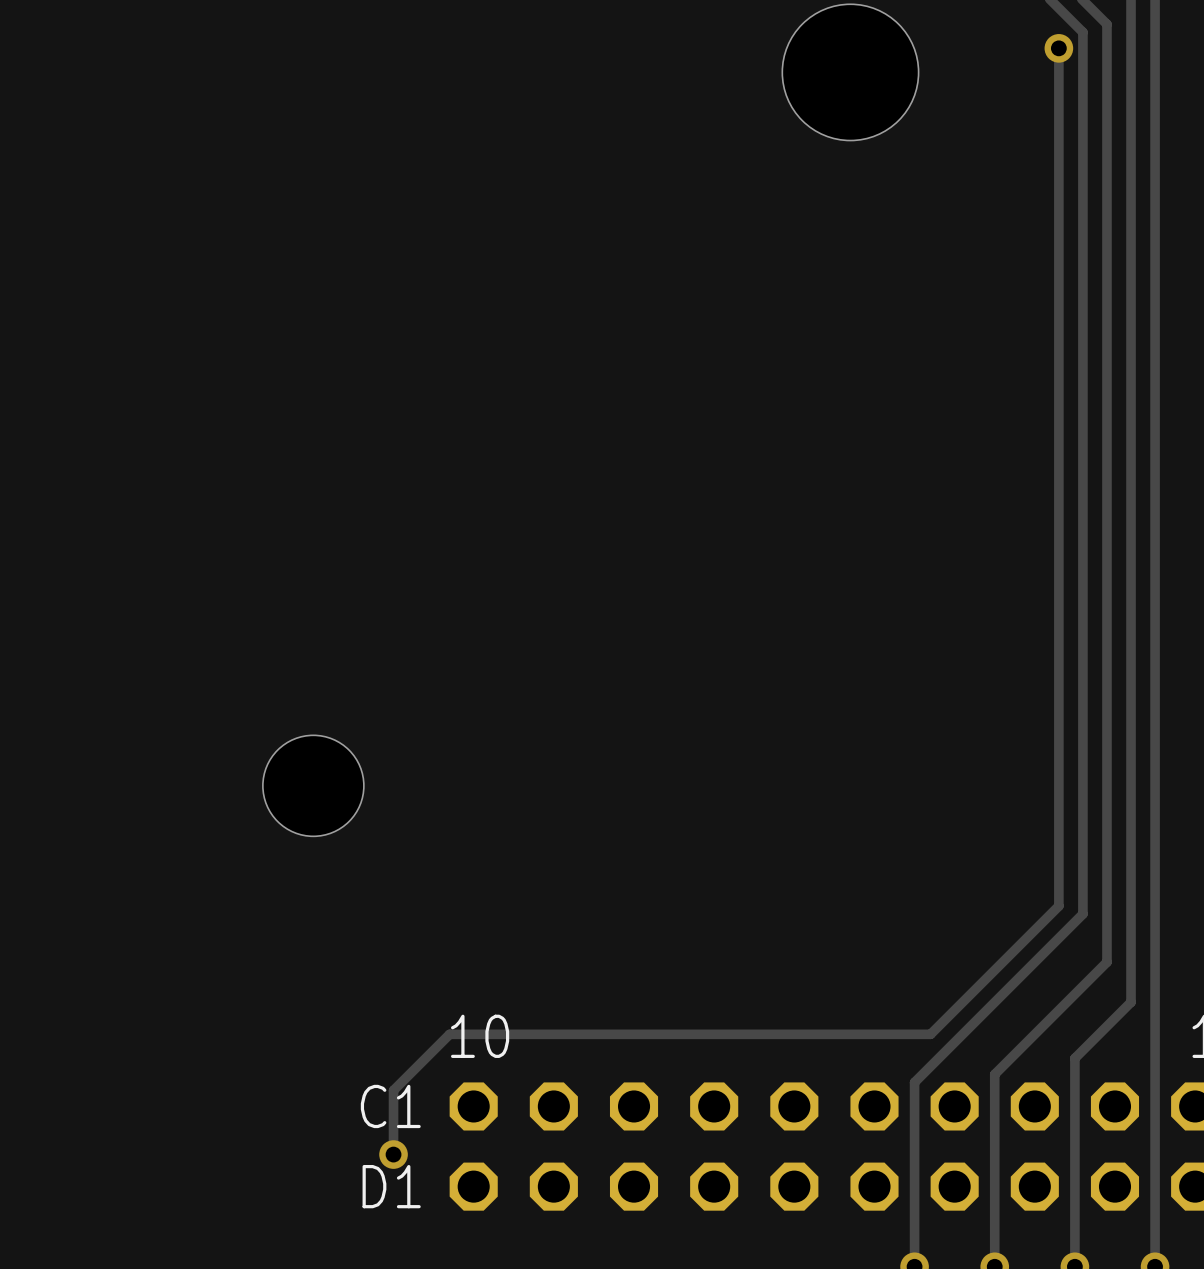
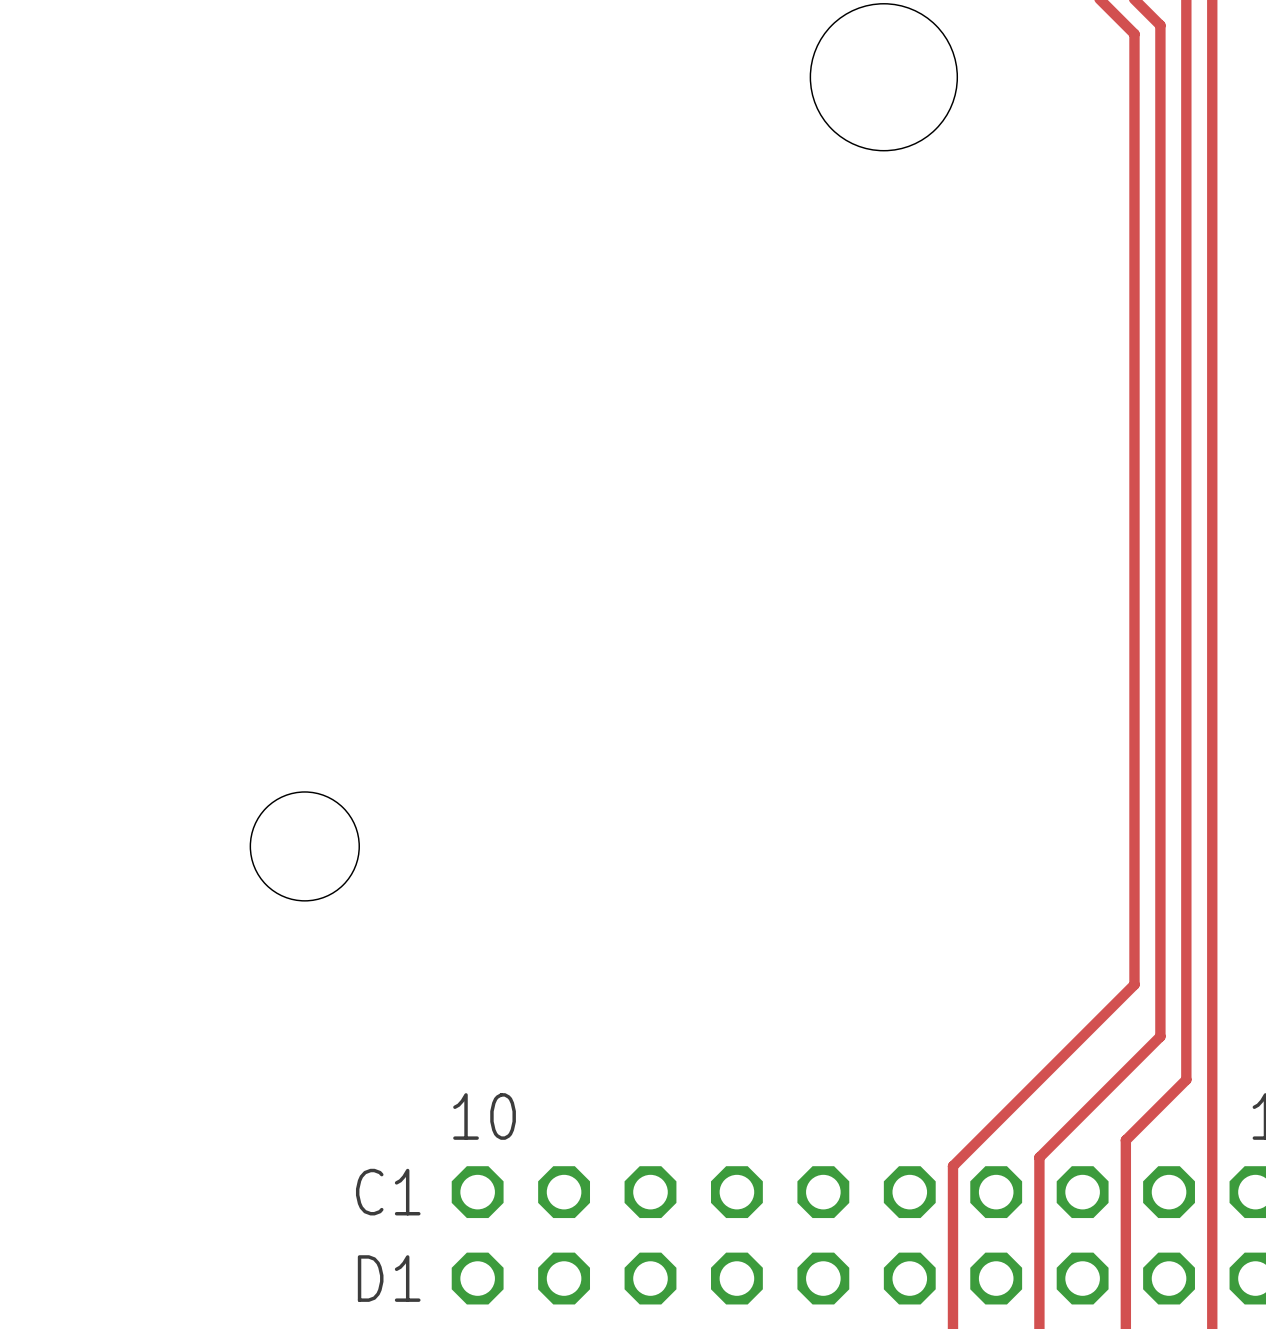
track: (1058, 48) (1058, 906) (930, 1034) (449, 1034) (393, 1090) (393, 1154) -> none
via: (1058, 48) -> none
via: (393, 1154) -> none

